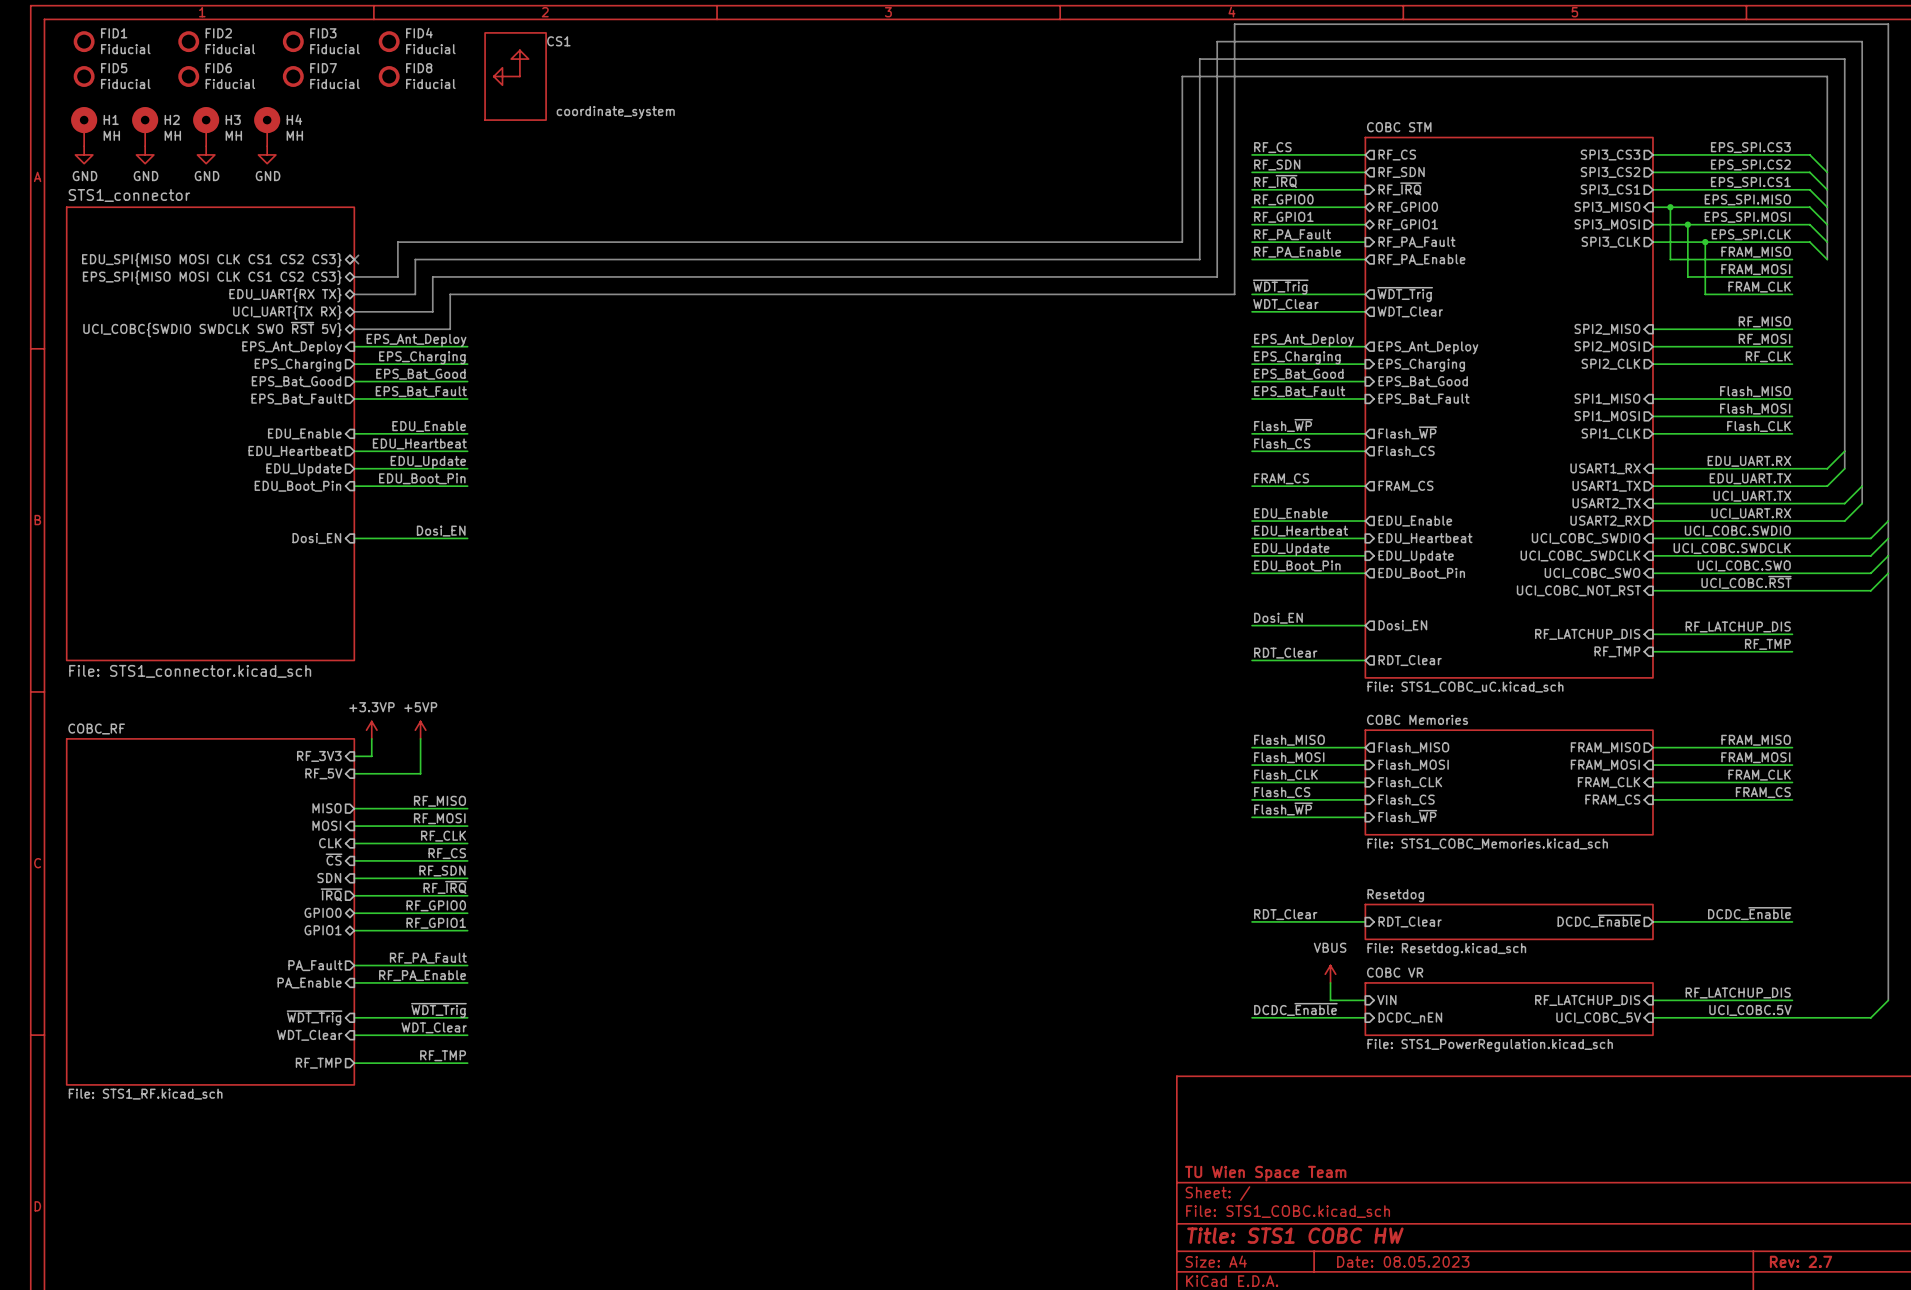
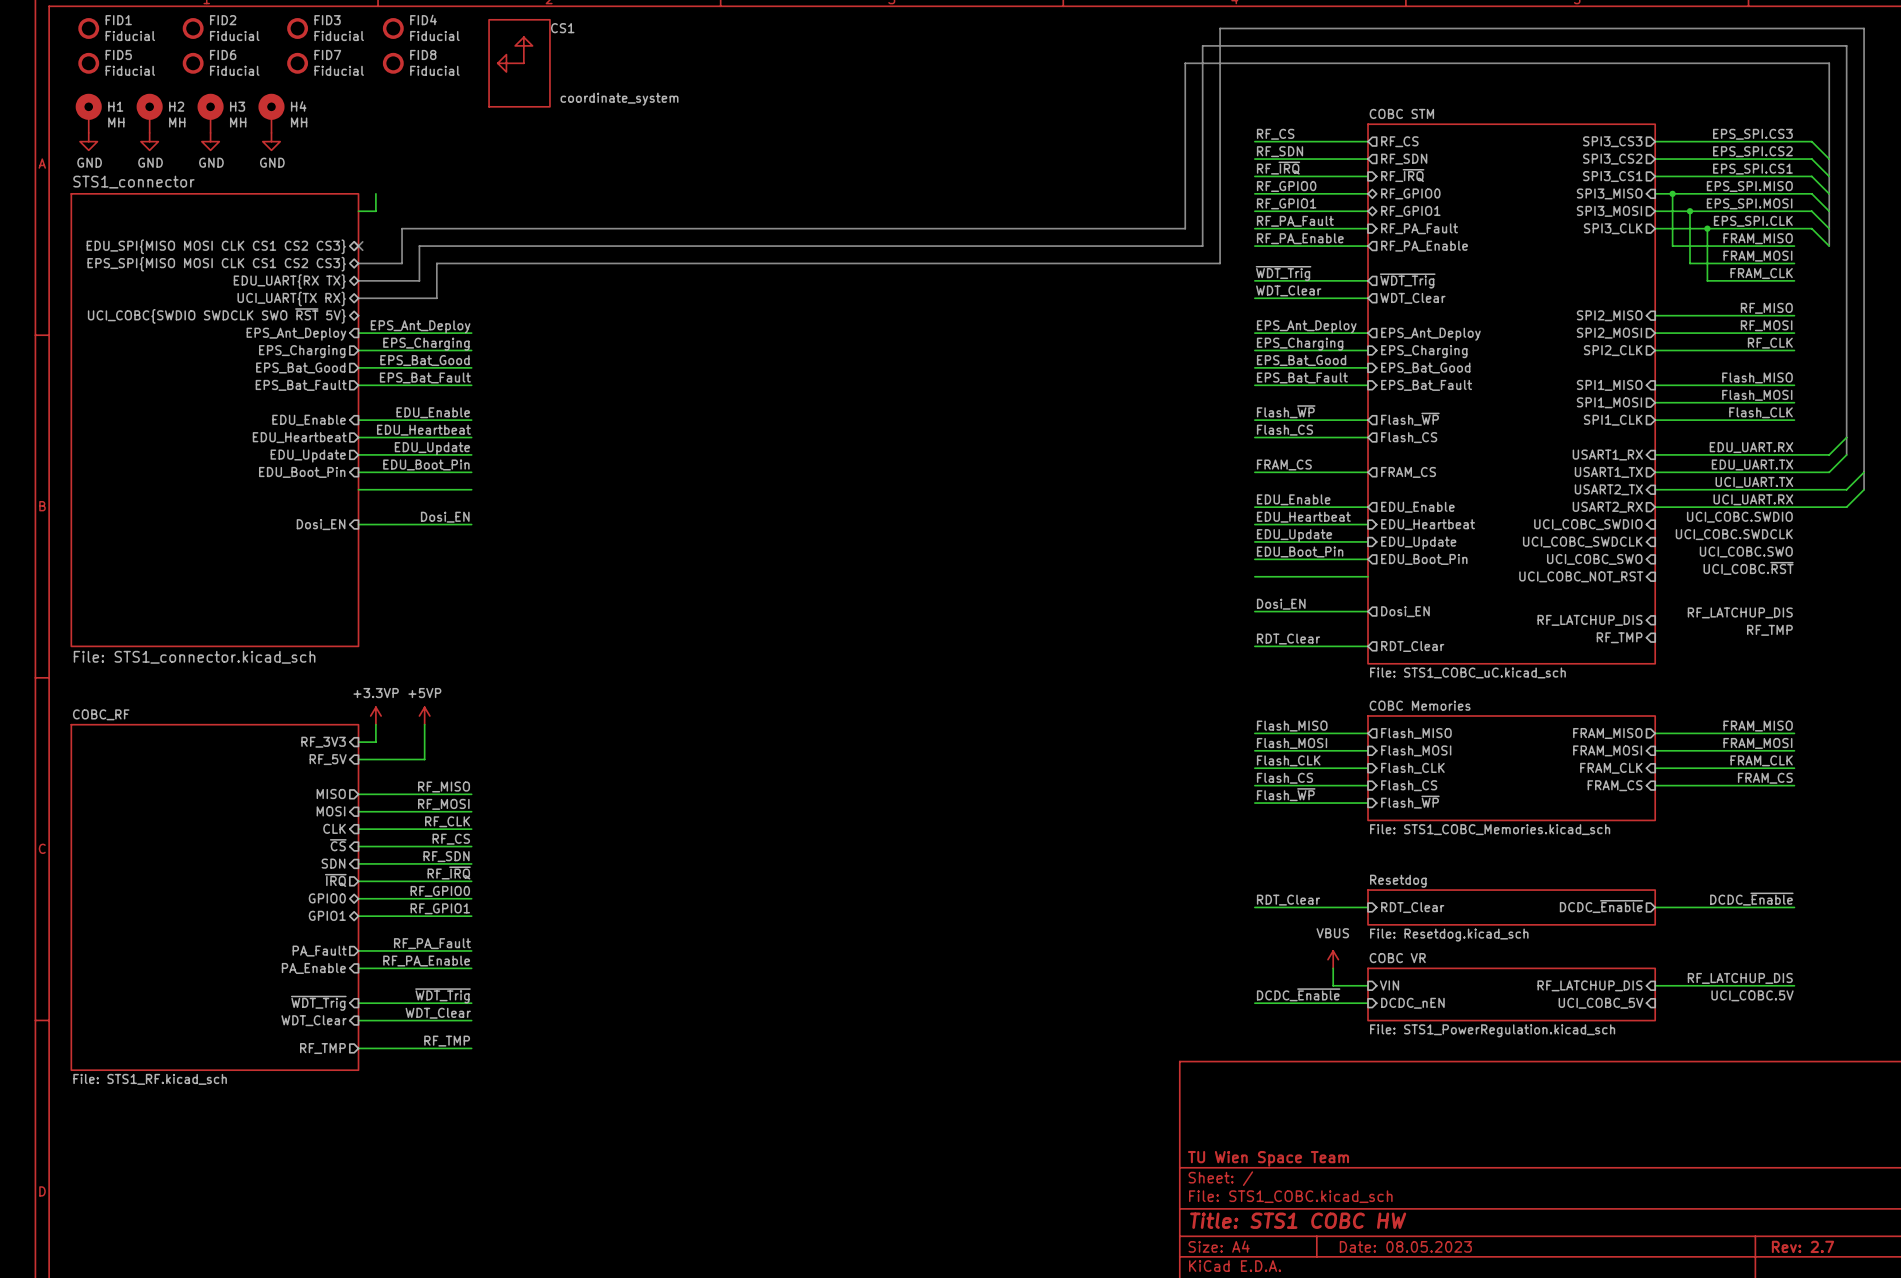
wire: none -> (375, 193) (375, 211) (358, 211)
bus: (354, 329) (450, 329) (450, 294) (1234, 294) (1234, 24) (1888, 24) (1888, 1000) -> none
wire: none -> (358, 489) (471, 489)
wire: (1888, 521) (1870, 538) (1652, 538) -> none
wire: (1888, 538) (1870, 555) (1652, 555) -> none
wire: (1888, 555) (1870, 573) (1652, 573) -> none
wire: (1888, 573) (1870, 590) (1652, 590) -> none
wire: none -> (1254, 576) (1368, 576)
wire: (1652, 634) (1792, 634) -> none
wire: (1652, 651) (1792, 651) -> none
wire: (1888, 1000) (1870, 1017) (1652, 1017) -> none

